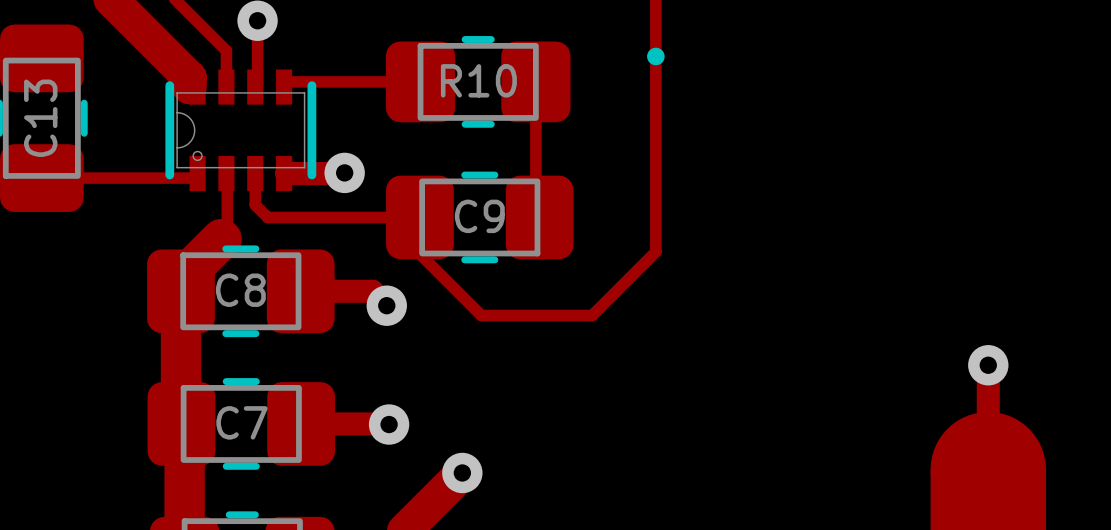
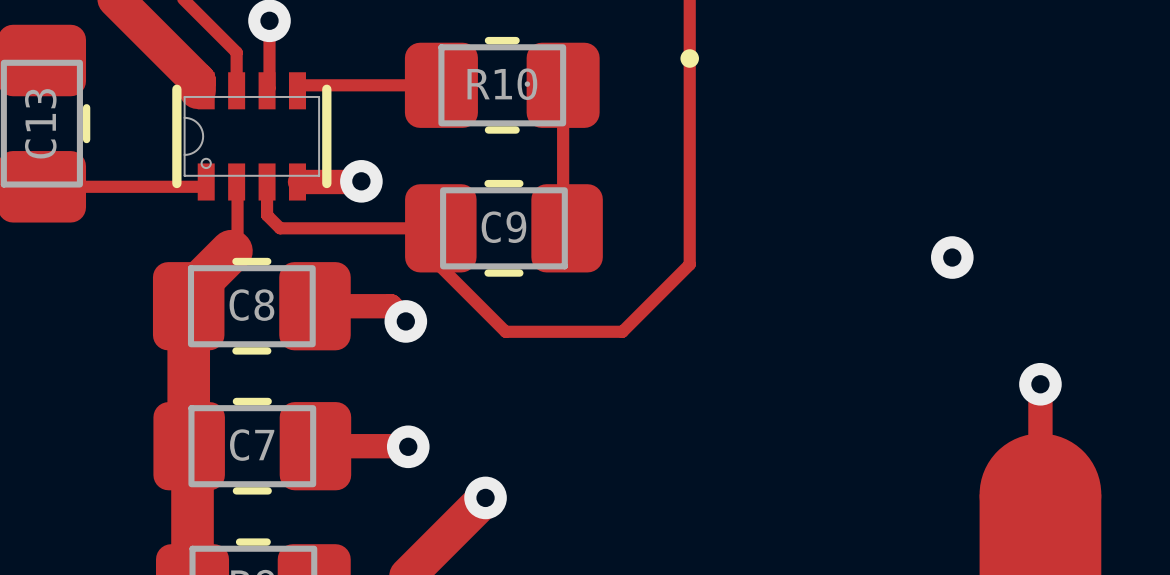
via: none -> (952, 257)

